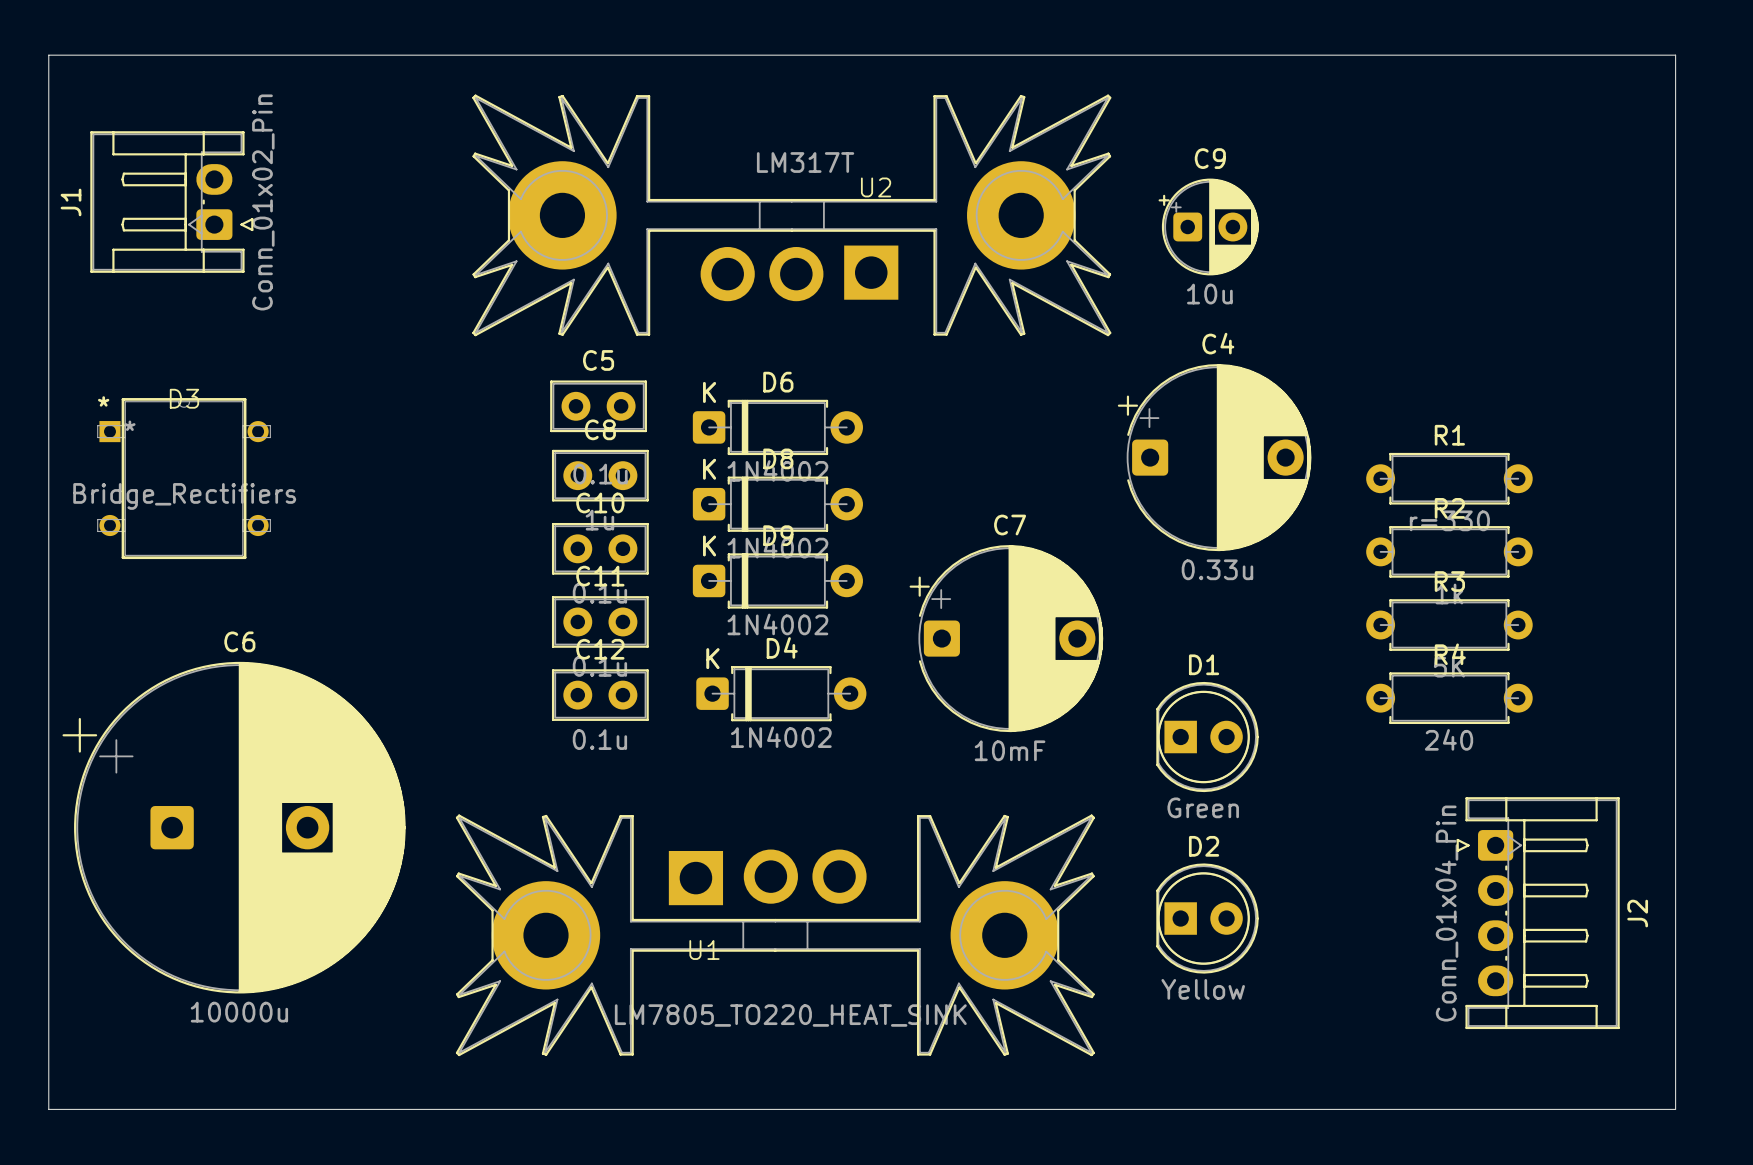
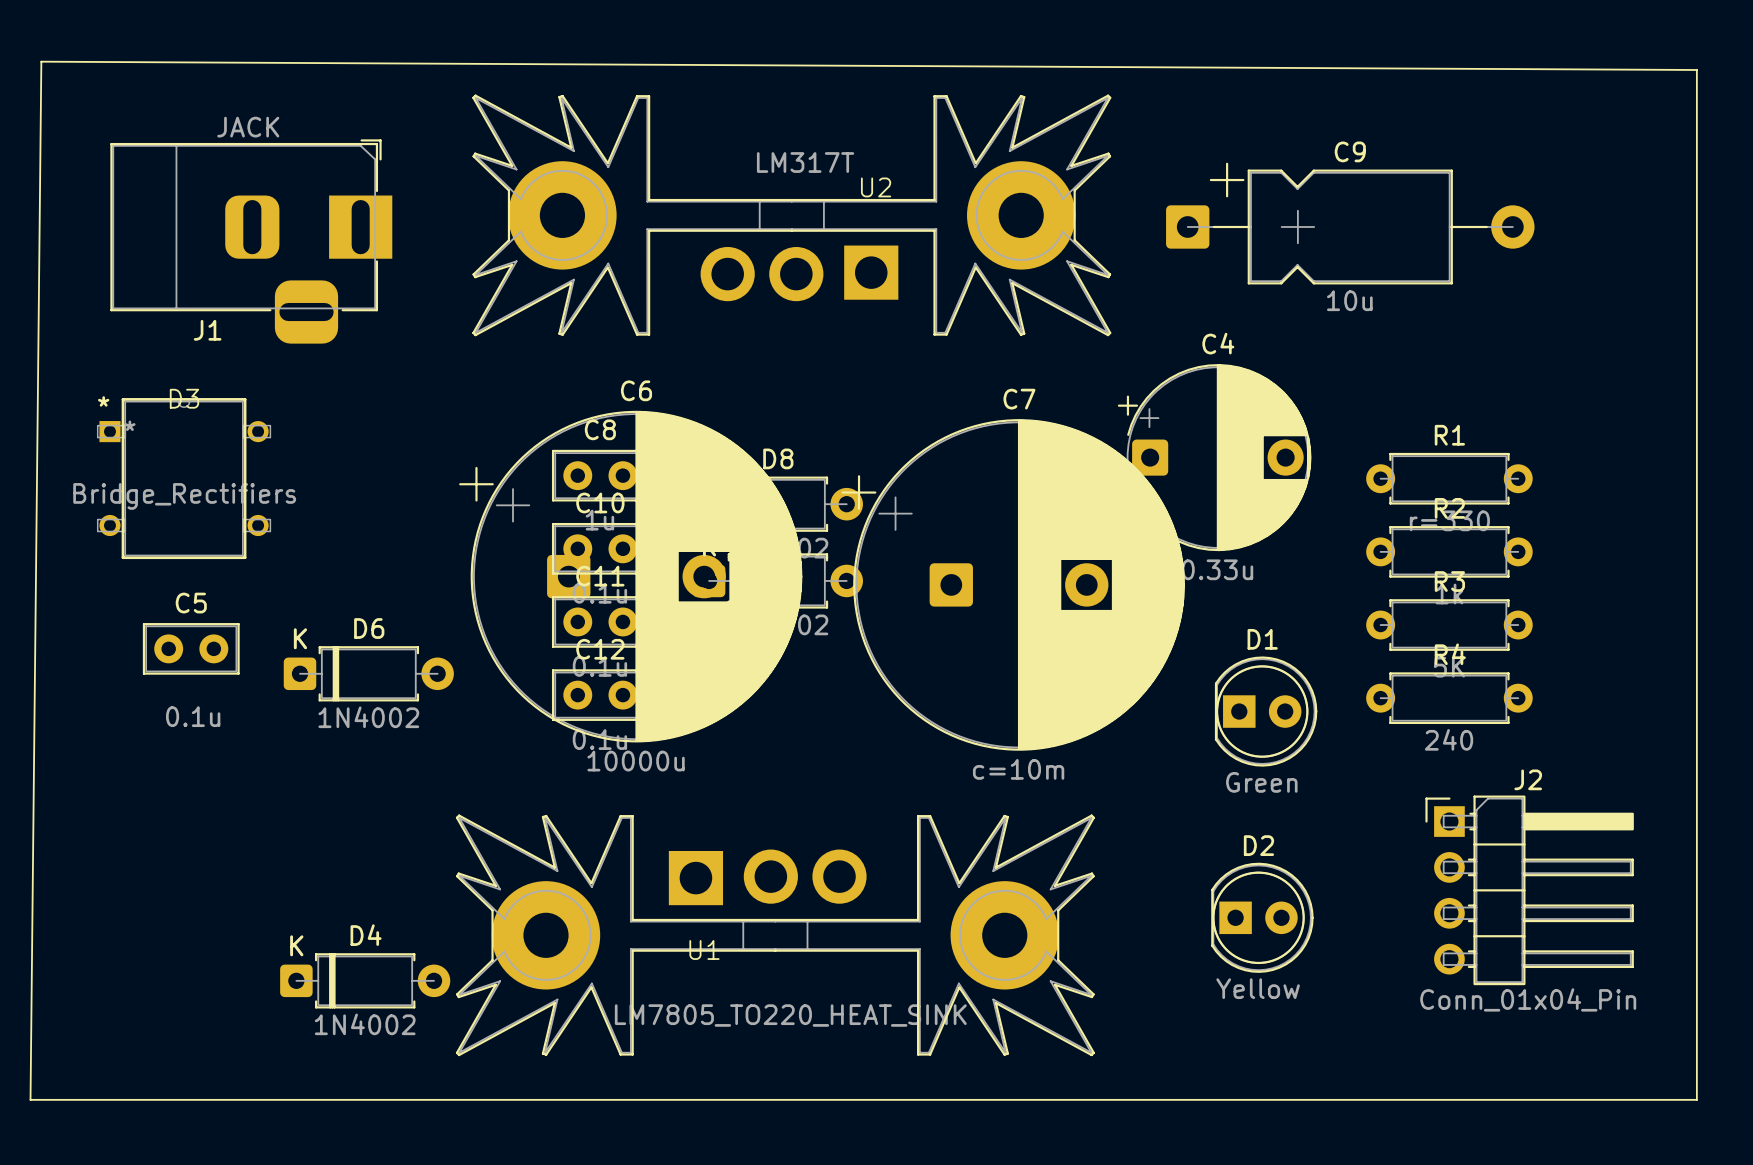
board edge: (48, 55) (1675, 55) (1675, 1109) (48, 1109) (48, 55) -> none
line: none -> (41, 61) (30, 1099) (1696, 1099) (1696, 69) (41, 61)
J1 footprint: [90, 131, 254, 273] -> [110, 139, 393, 344]
C9 footprint: [1158, 178, 1259, 276] -> [1166, 162, 1535, 285]
J1 name position: J1 (71, 202) -> J1 (207, 330)
J1 value: Conn_01x02_Pin (263, 202) -> JACK (248, 127)
C5 position: (598, 406) -> (191, 648)
D6 position: (777, 427) -> (368, 673)
C7 name position: C7 (1010, 525) -> C7 (1019, 399)
C7 footprint: [909, 545, 1104, 733] -> [841, 419, 1185, 751]
D4 position: (781, 693) -> (365, 980)
D1 position: (1207, 737) -> (1266, 711)
C7 value: 10mF (1010, 750) -> c=10m (1018, 769)
J2 footprint: [1456, 797, 1620, 1030] -> [1425, 795, 1634, 986]
C6 position: (234, 827) -> (630, 576)
J2 value position: Conn_01x04_Pin (1446, 913) -> Conn_01x04_Pin (1528, 999)
J2 name position: J2 (1637, 913) -> J2 (1528, 779)
D2 position: (1207, 918) -> (1262, 917)

